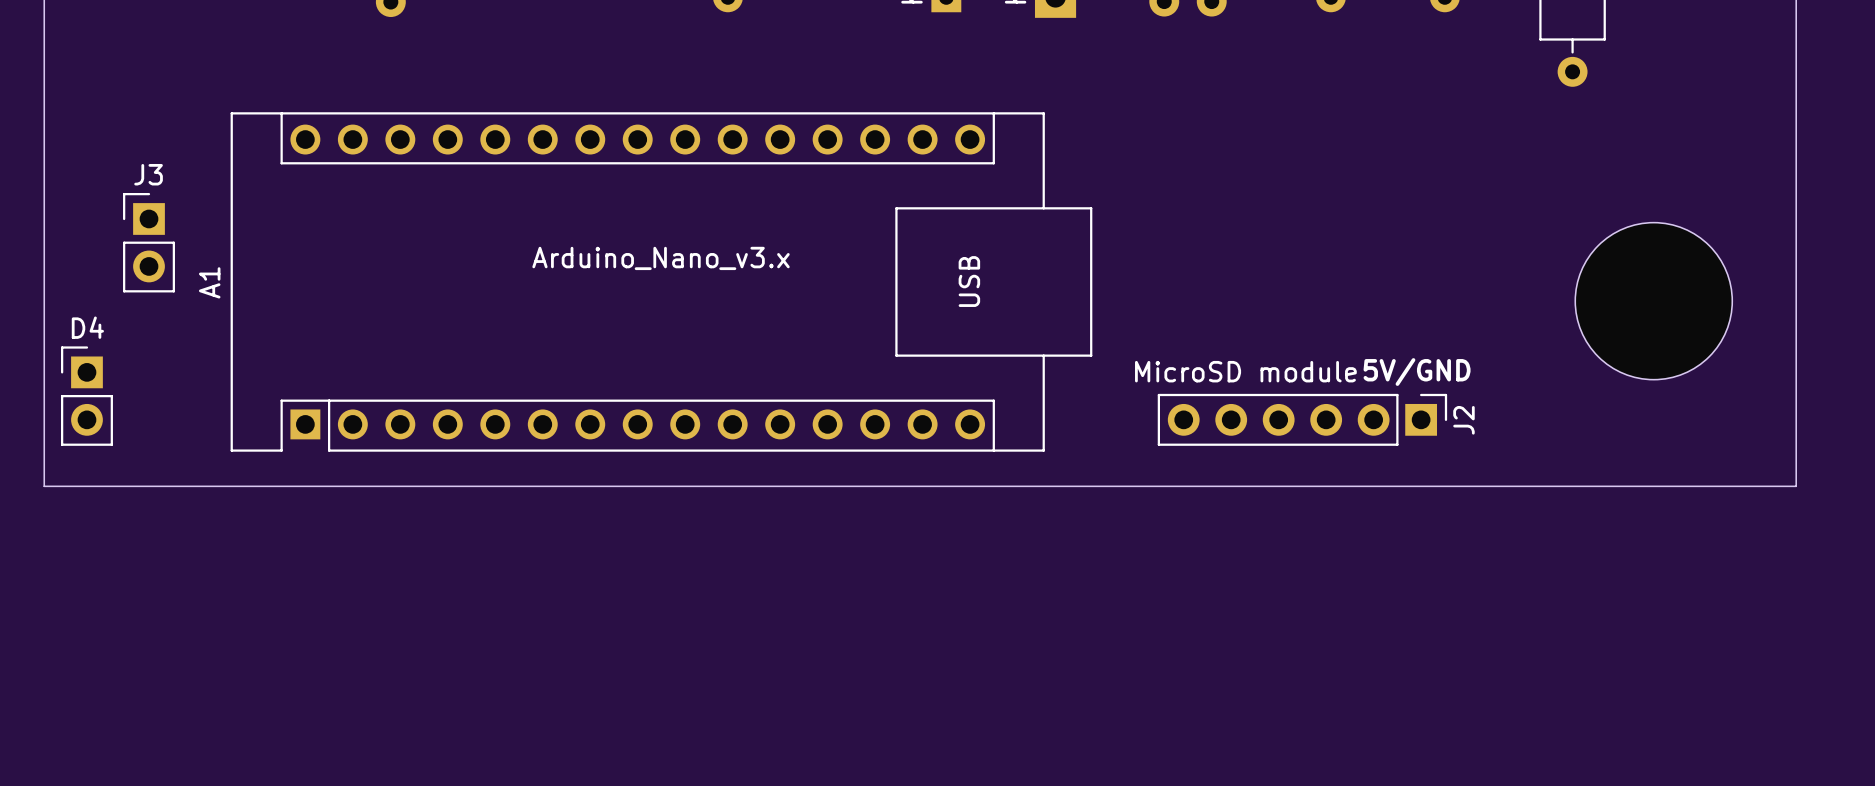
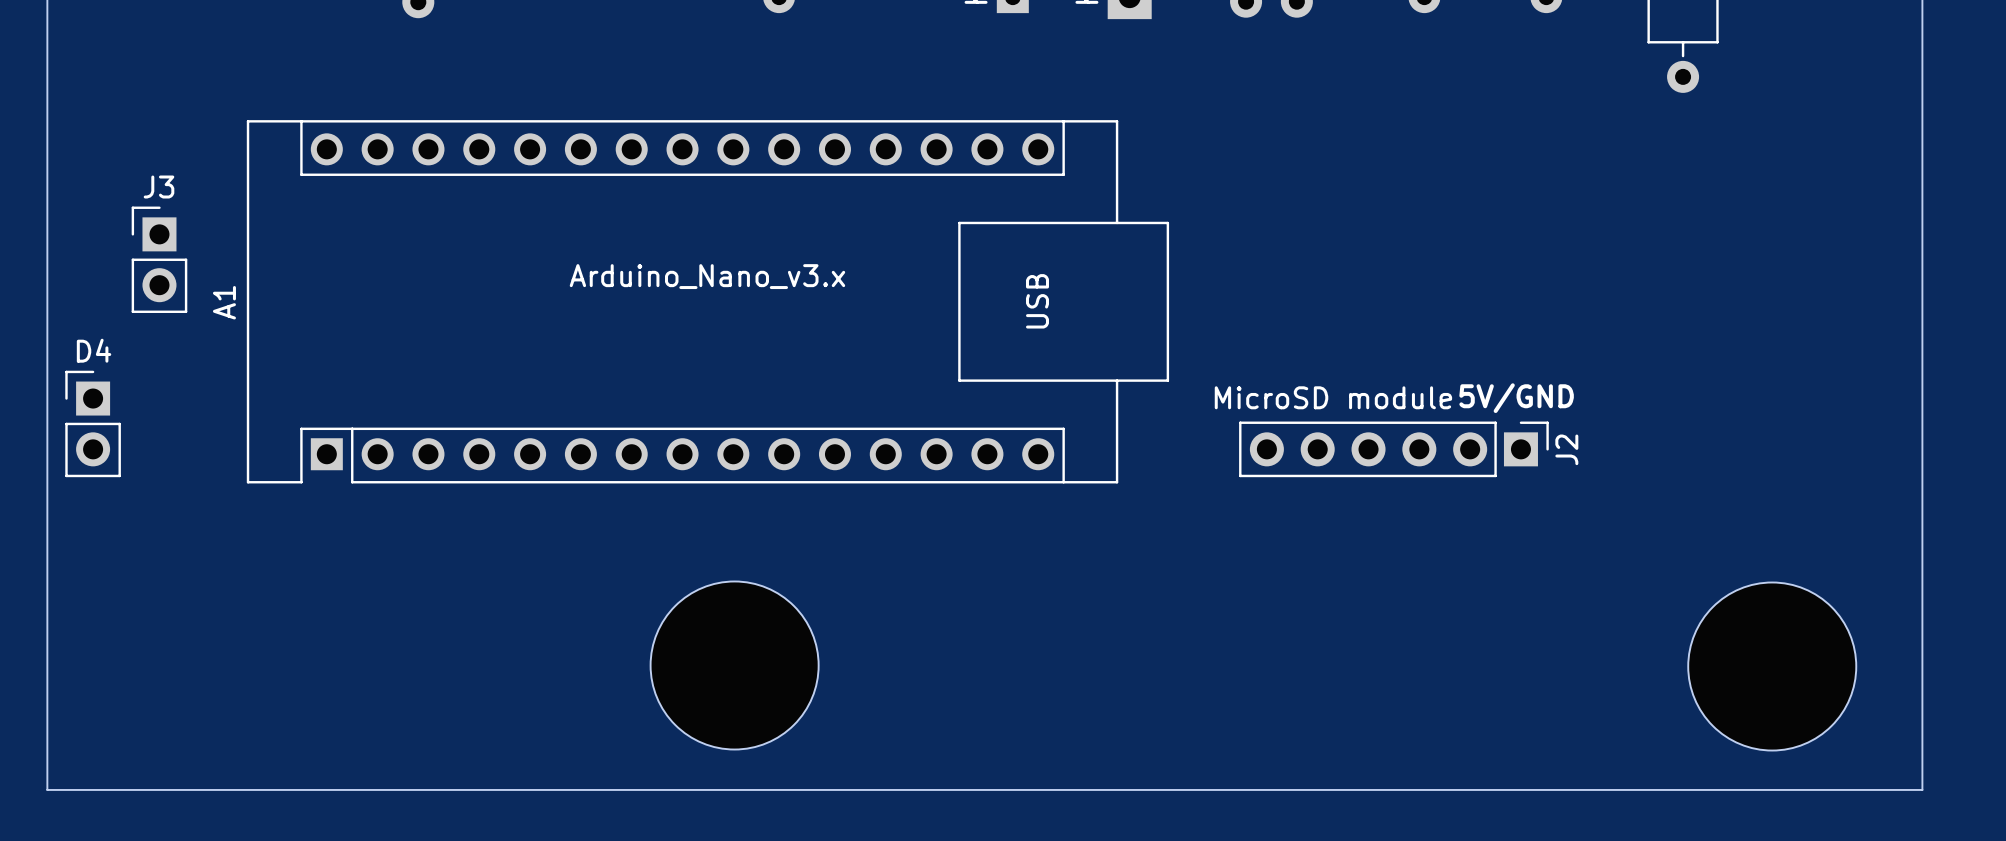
part position: (1653, 301) -> (1772, 666)
board edge: (44, 486) (1796, 486) -> (47, 520) (47, 789) (1922, 789) (1922, 520)
part: none -> (734, 665)

